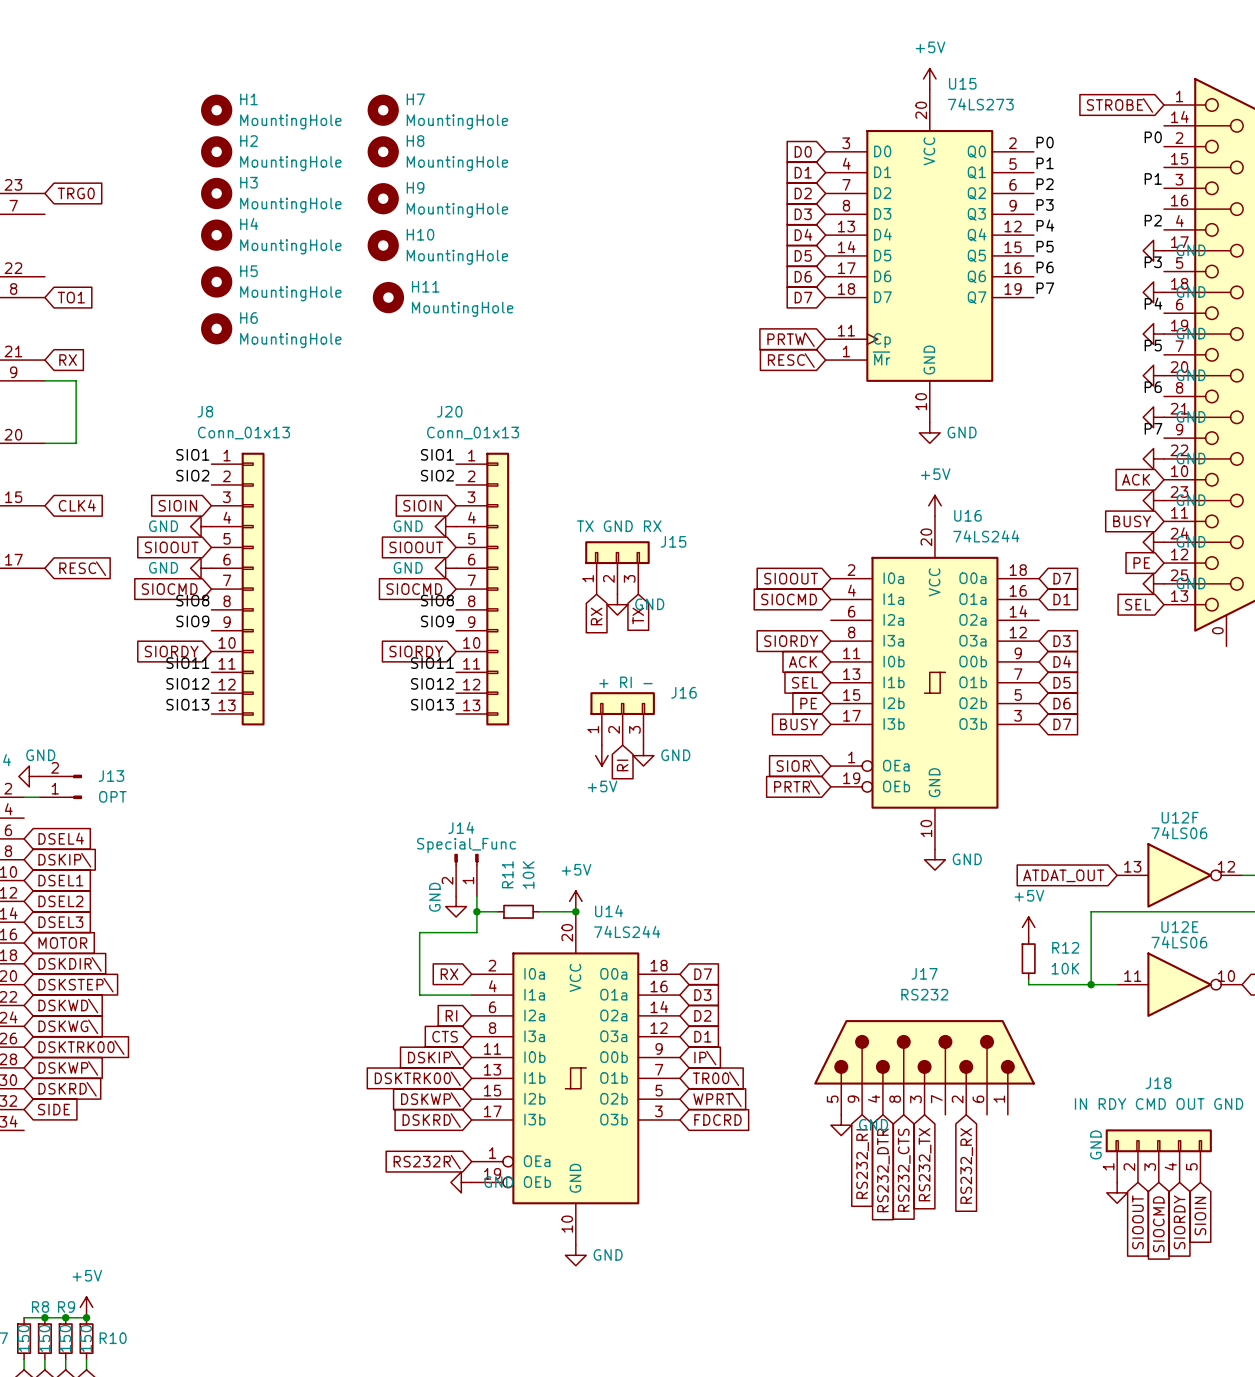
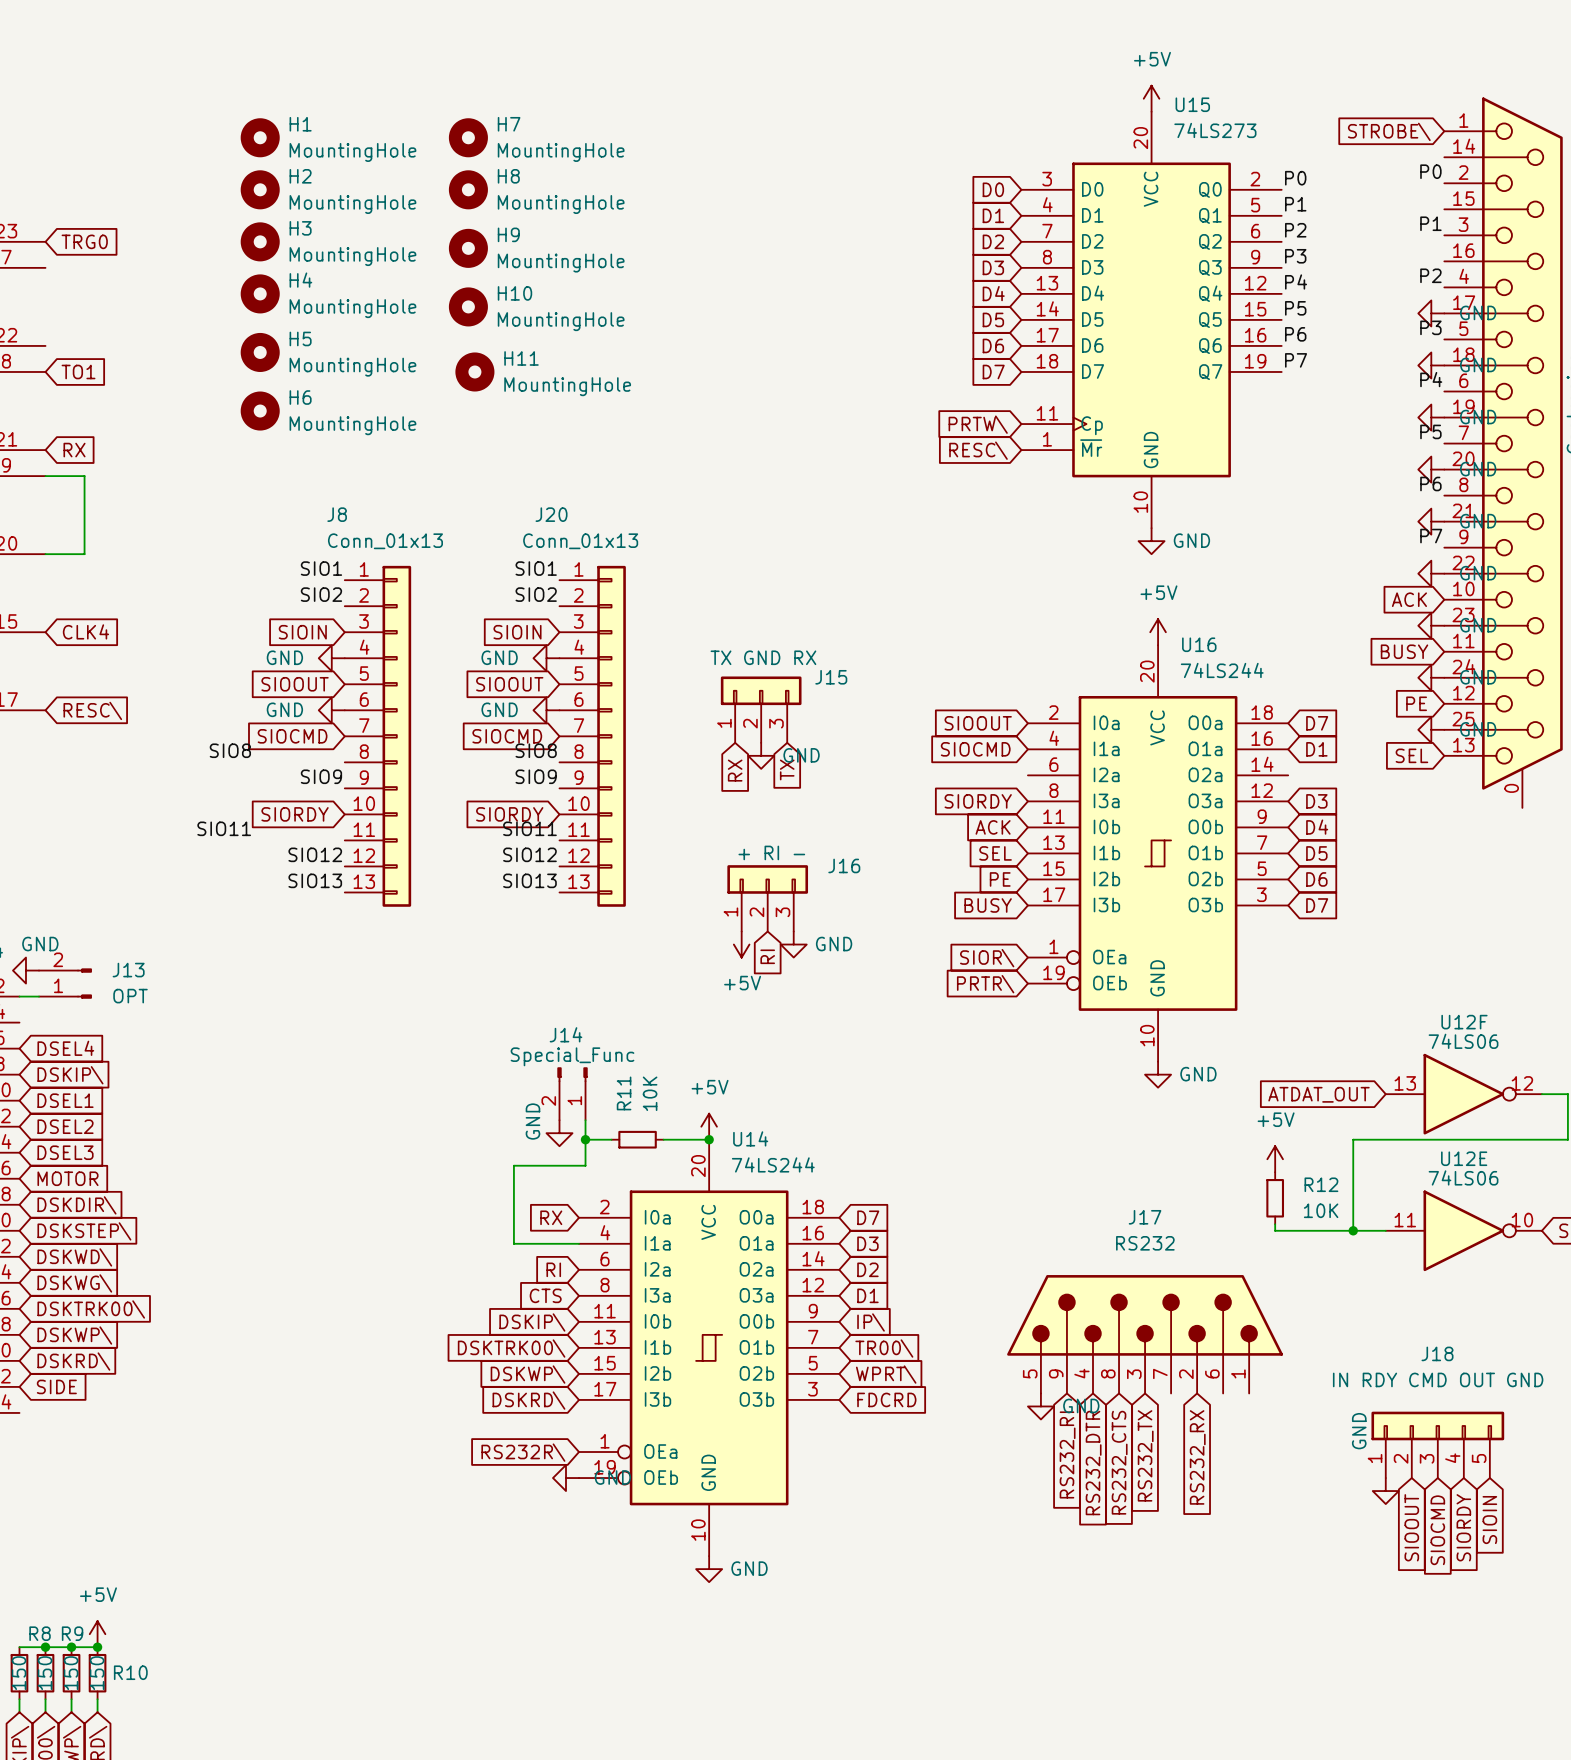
label position: SIO1 (192, 454) -> SIO1 (321, 568)
label position: SIO2 (192, 475) -> SIO2 (321, 594)
global label position: SIOIN (177, 505) -> SIOIN (302, 632)
power symbol: GND (201, 526) -> none
power symbol: none -> GND (331, 658)
global label position: SIOOUT (171, 547) -> SIOOUT (295, 684)
power symbol: GND (201, 568) -> none
power symbol: none -> GND (331, 710)
global label position: SIOCMD (169, 589) -> SIOCMD (292, 736)
J8 position: (238, 589) -> (377, 736)
label position: SIO9 (192, 621) -> SIO9 (321, 776)
global label position: SIORDY (171, 651) -> SIORDY (295, 814)
label position: SIO12 (187, 683) -> SIO12 (315, 854)
label position: SIO13 (187, 704) -> SIO13 (315, 880)

